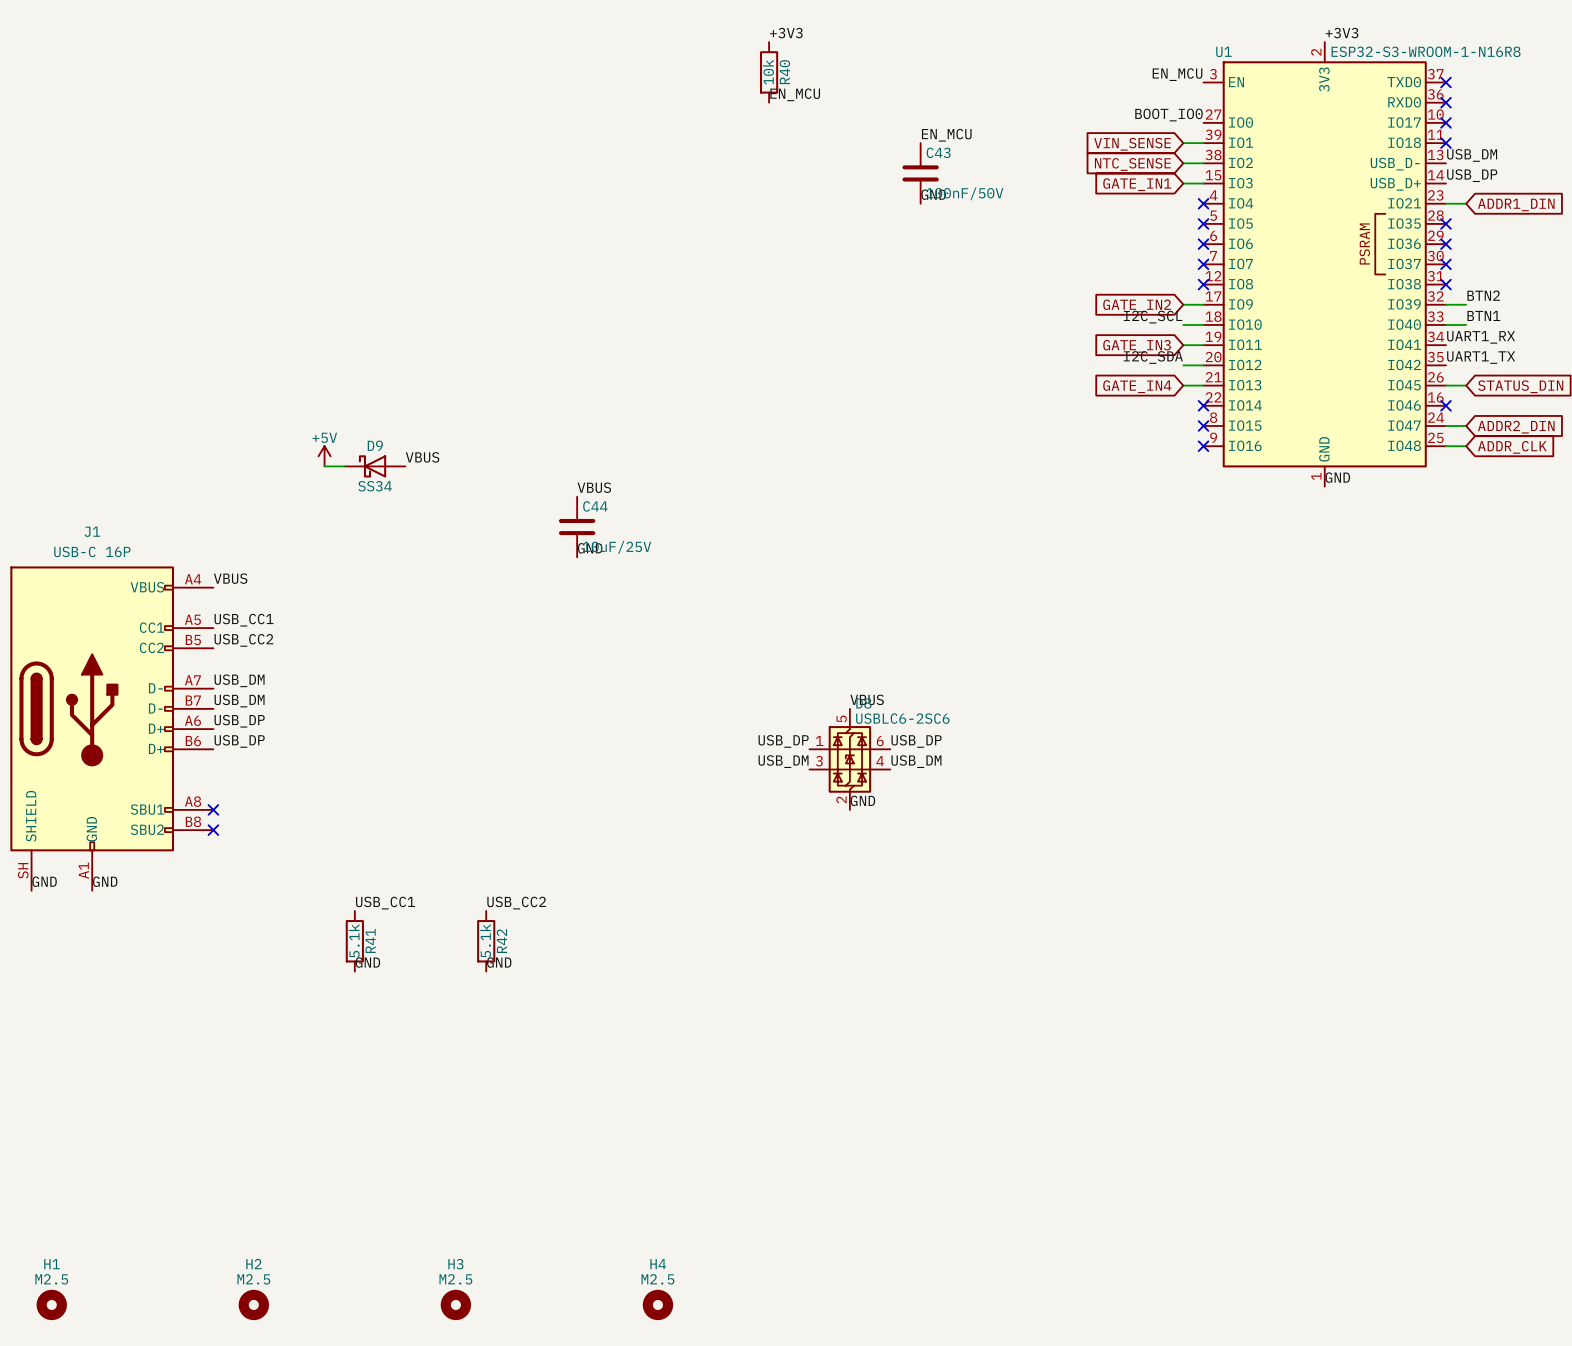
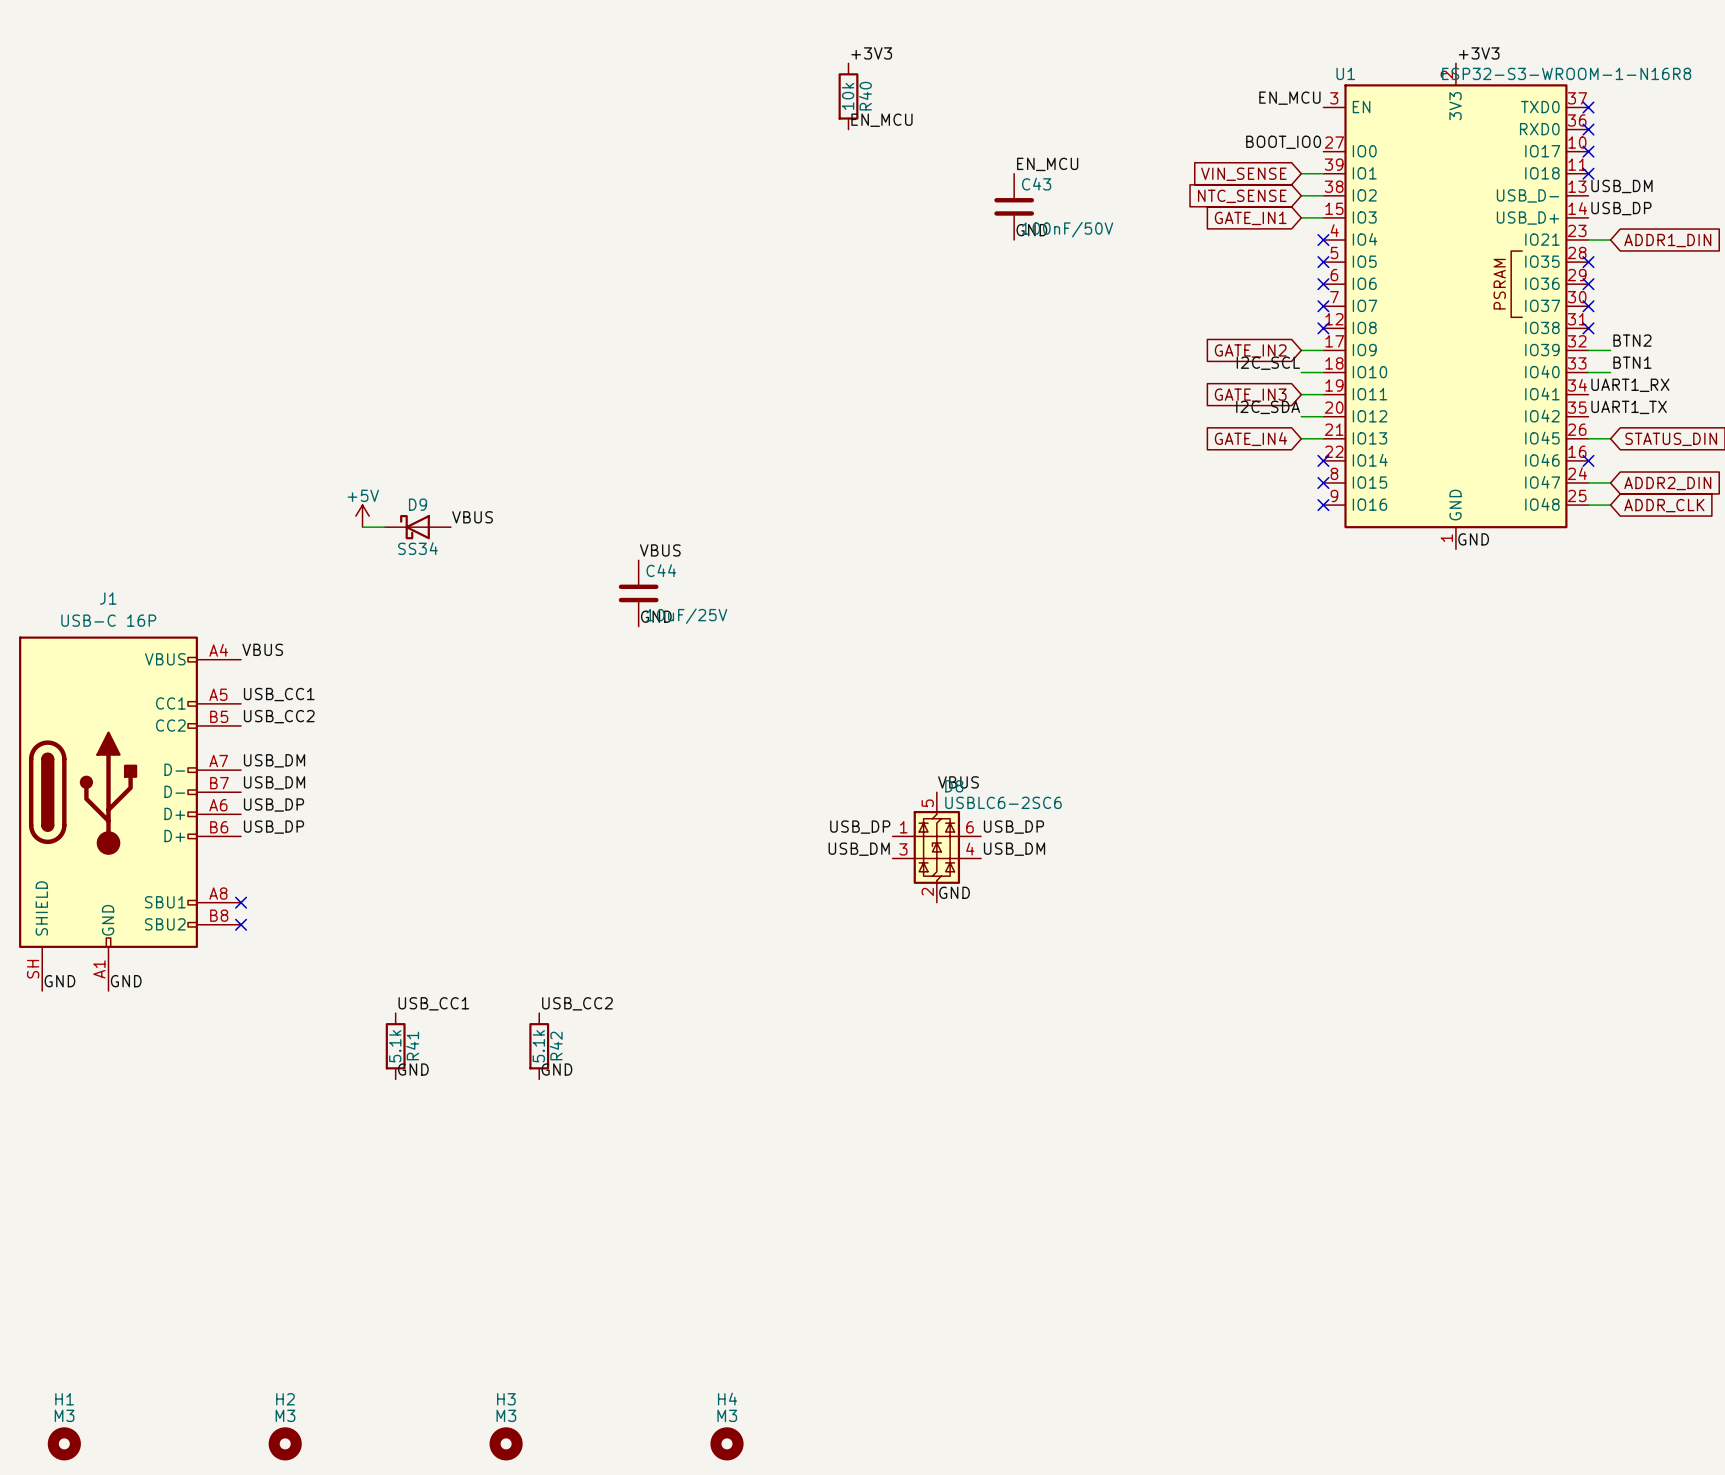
H1 value: M2.5 (51, 1279) -> M3 (64, 1415)
H2 value: M2.5 (253, 1279) -> M3 (285, 1415)
H3 value: M2.5 (455, 1279) -> M3 (506, 1415)
H4 value: M2.5 (657, 1279) -> M3 (727, 1415)

